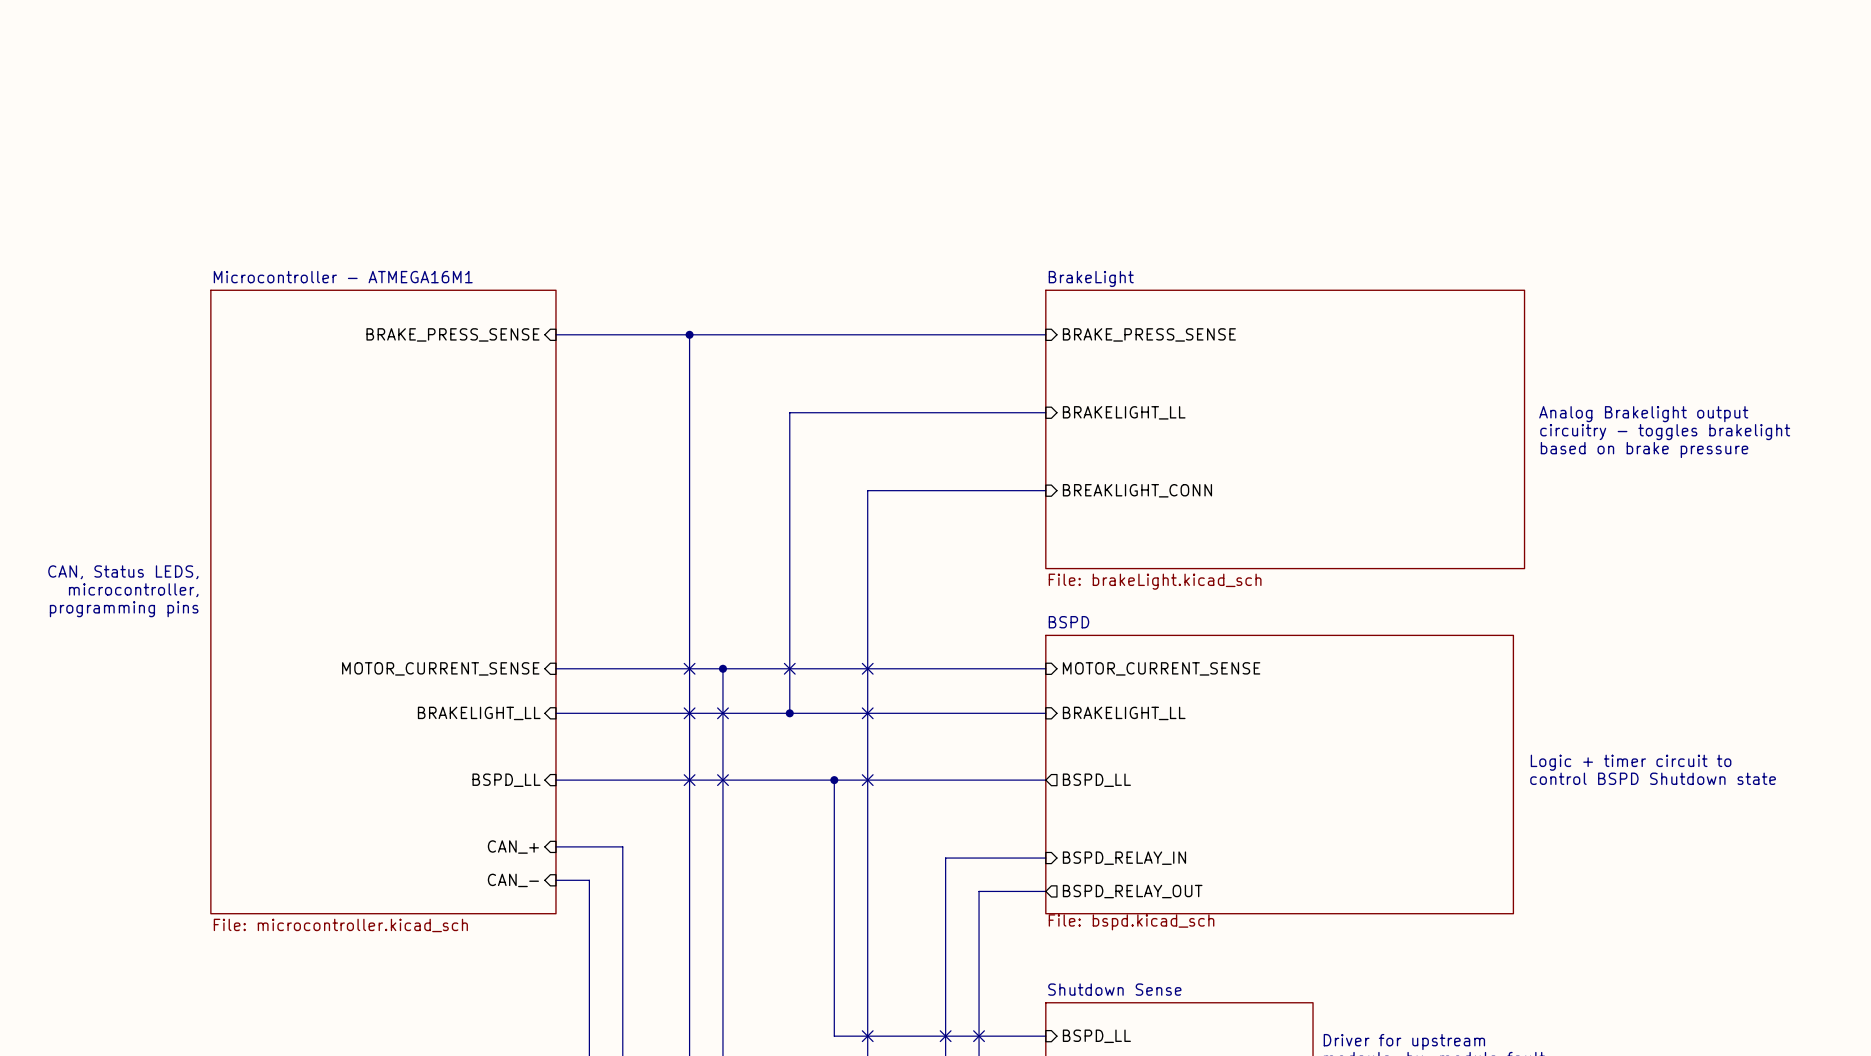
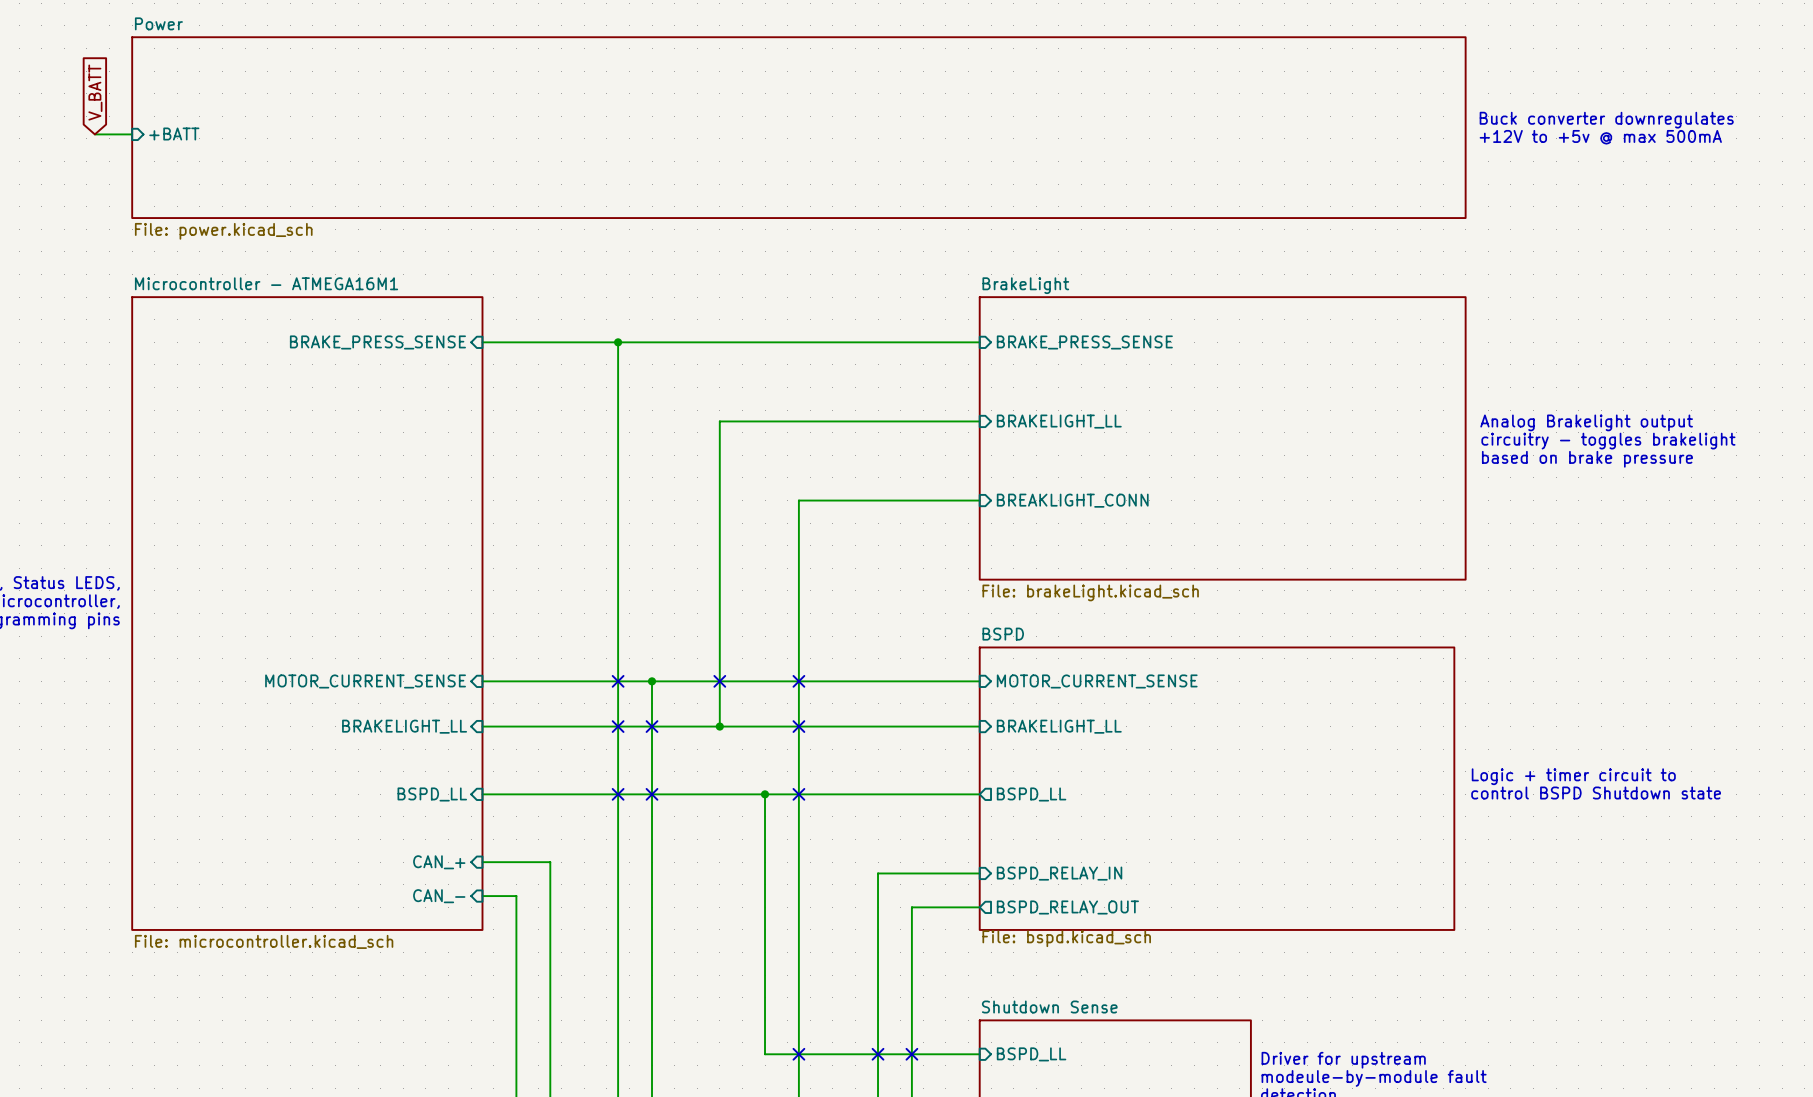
global label: none -> V_BATT (95, 92)
text: none -> Buck converter downregulates (1606, 120)
sheet Power: none -> File: power.kicad_sch (798, 127)
wire: none -> (94, 134) (132, 134)
sheet pin: none -> +BATT (174, 133)
text: none -> +12V to +5v @ max 500mA (1600, 137)

